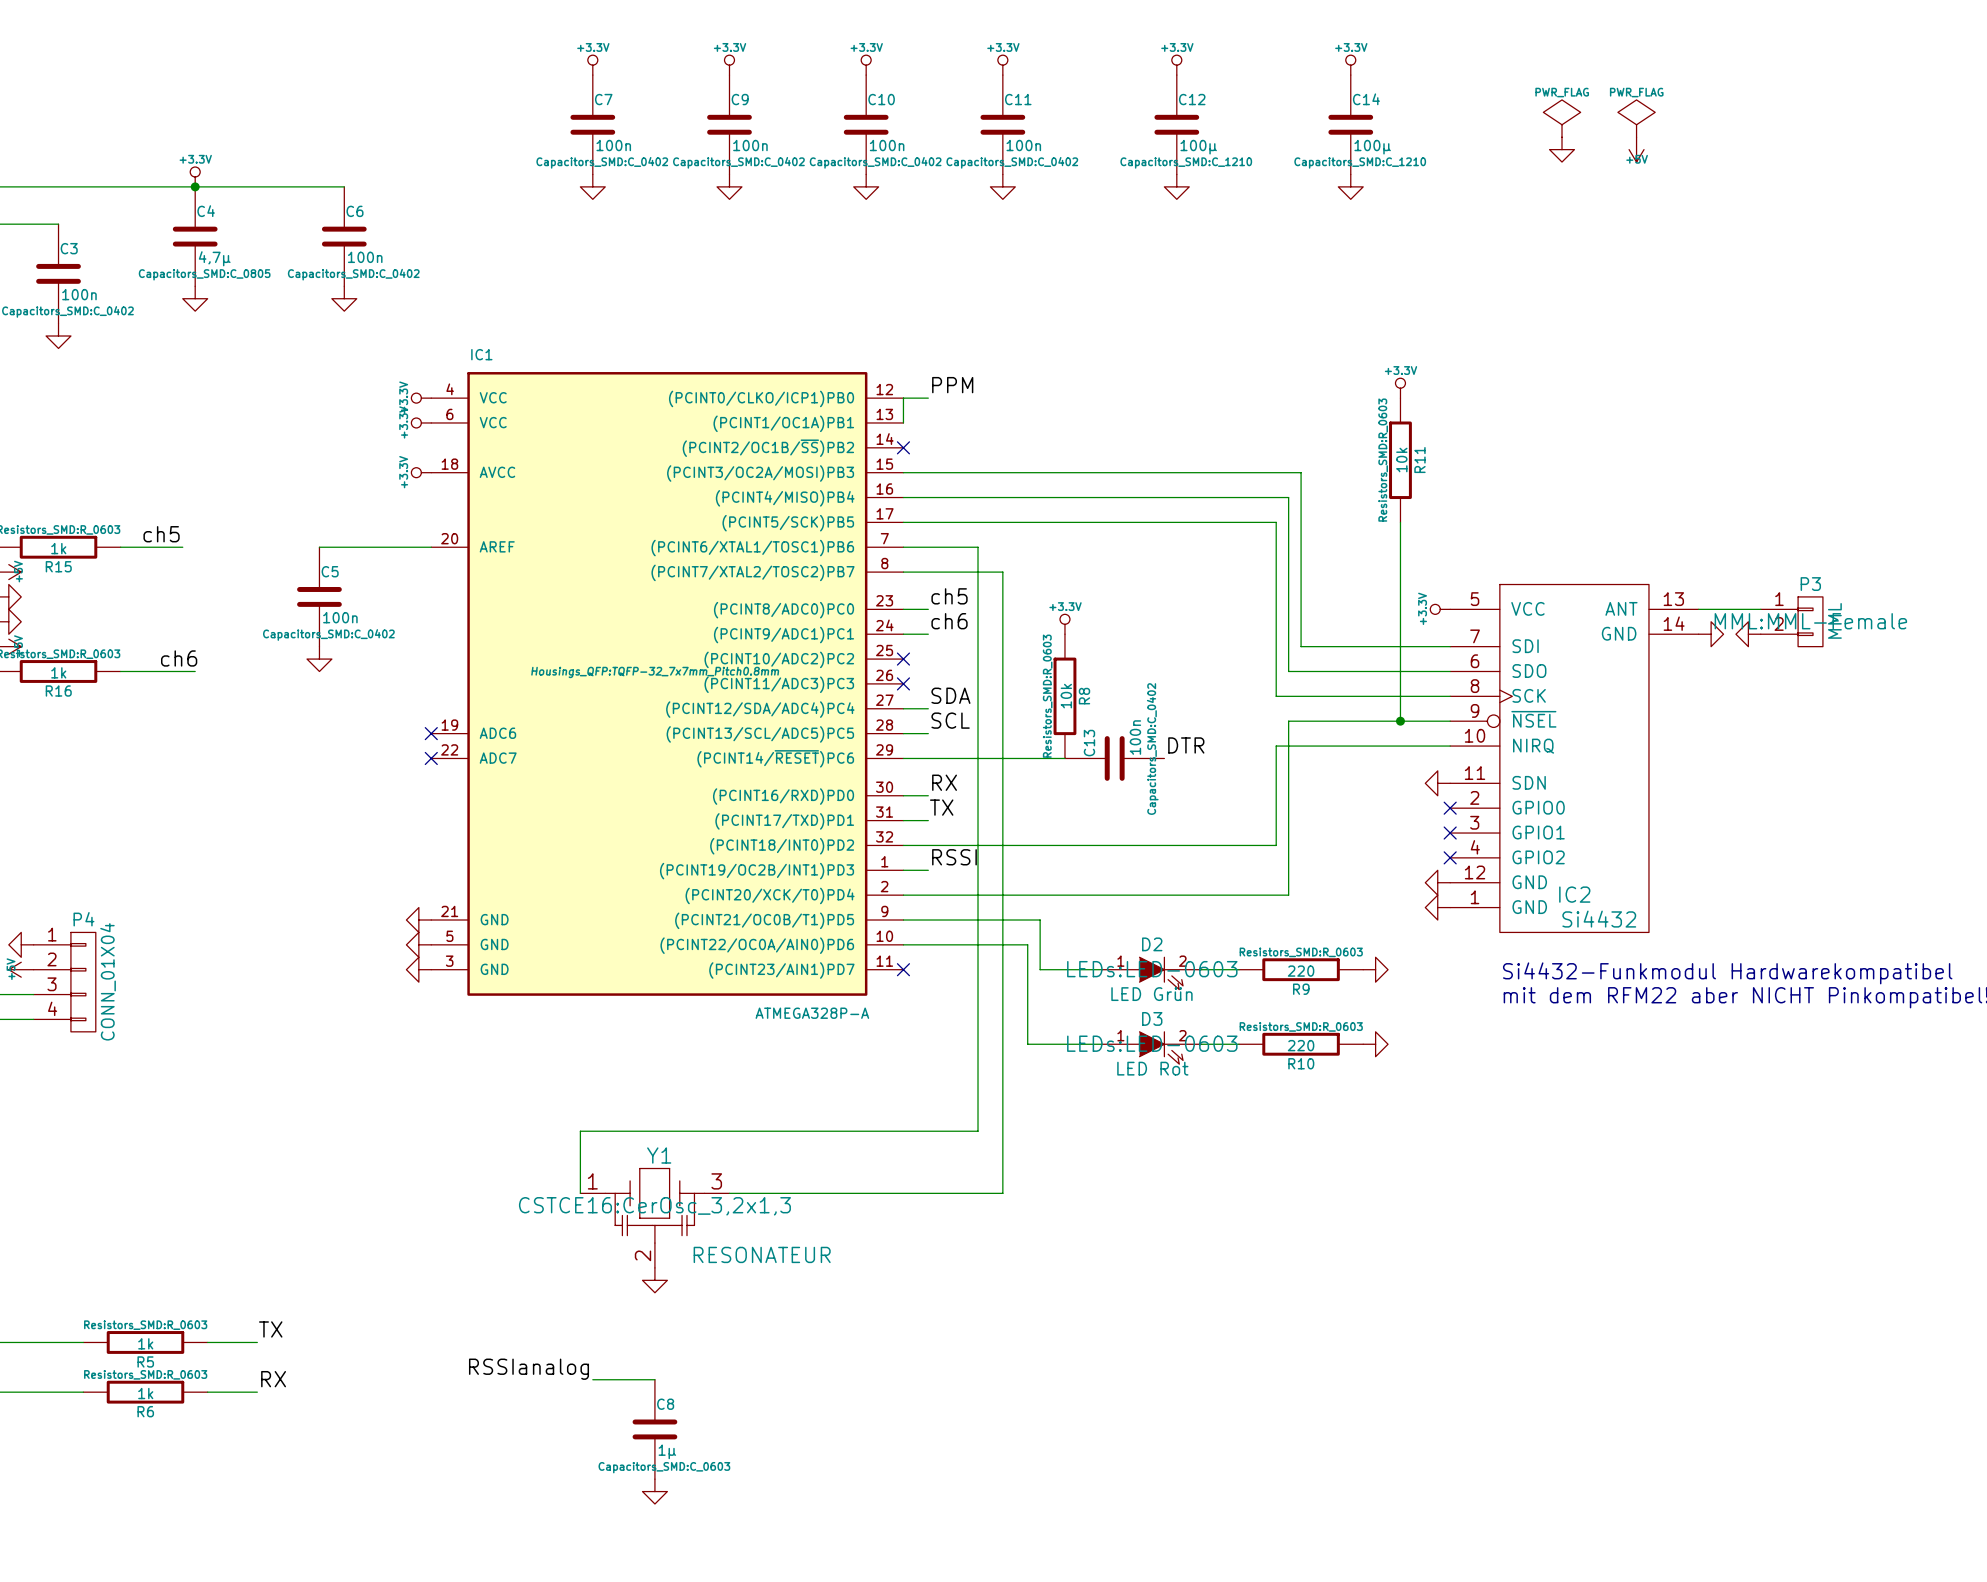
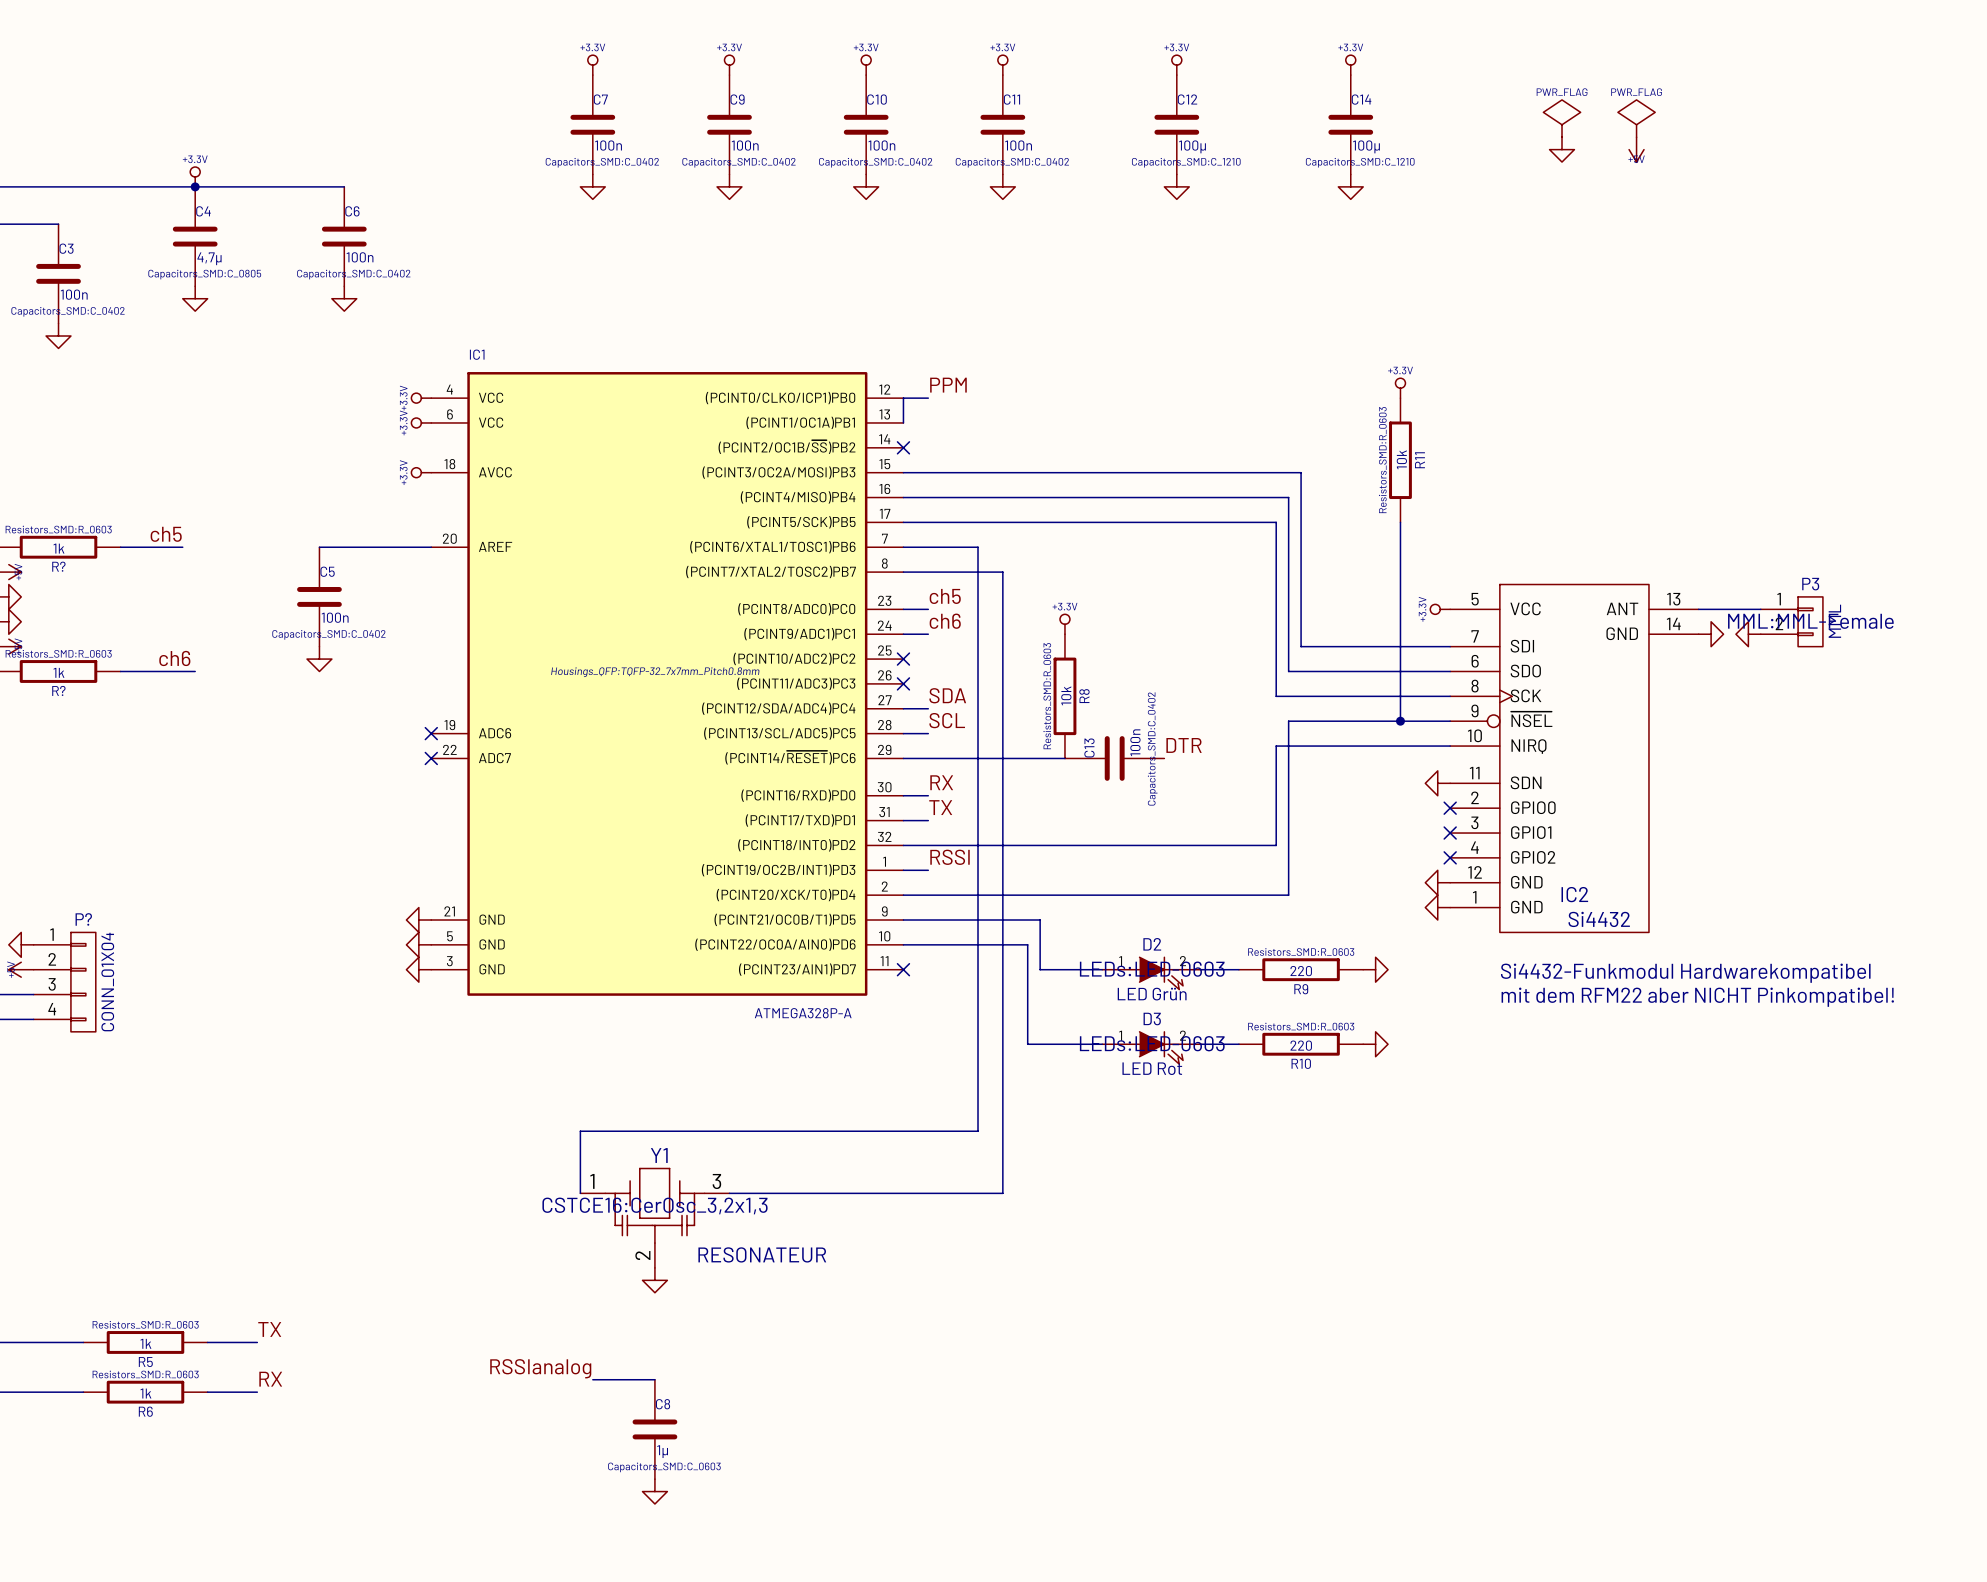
R15 name: R15 (58, 566) -> R? (58, 566)
R16 name: R16 (58, 691) -> R? (58, 690)
P4 name: P4 (83, 919) -> P? (83, 919)

